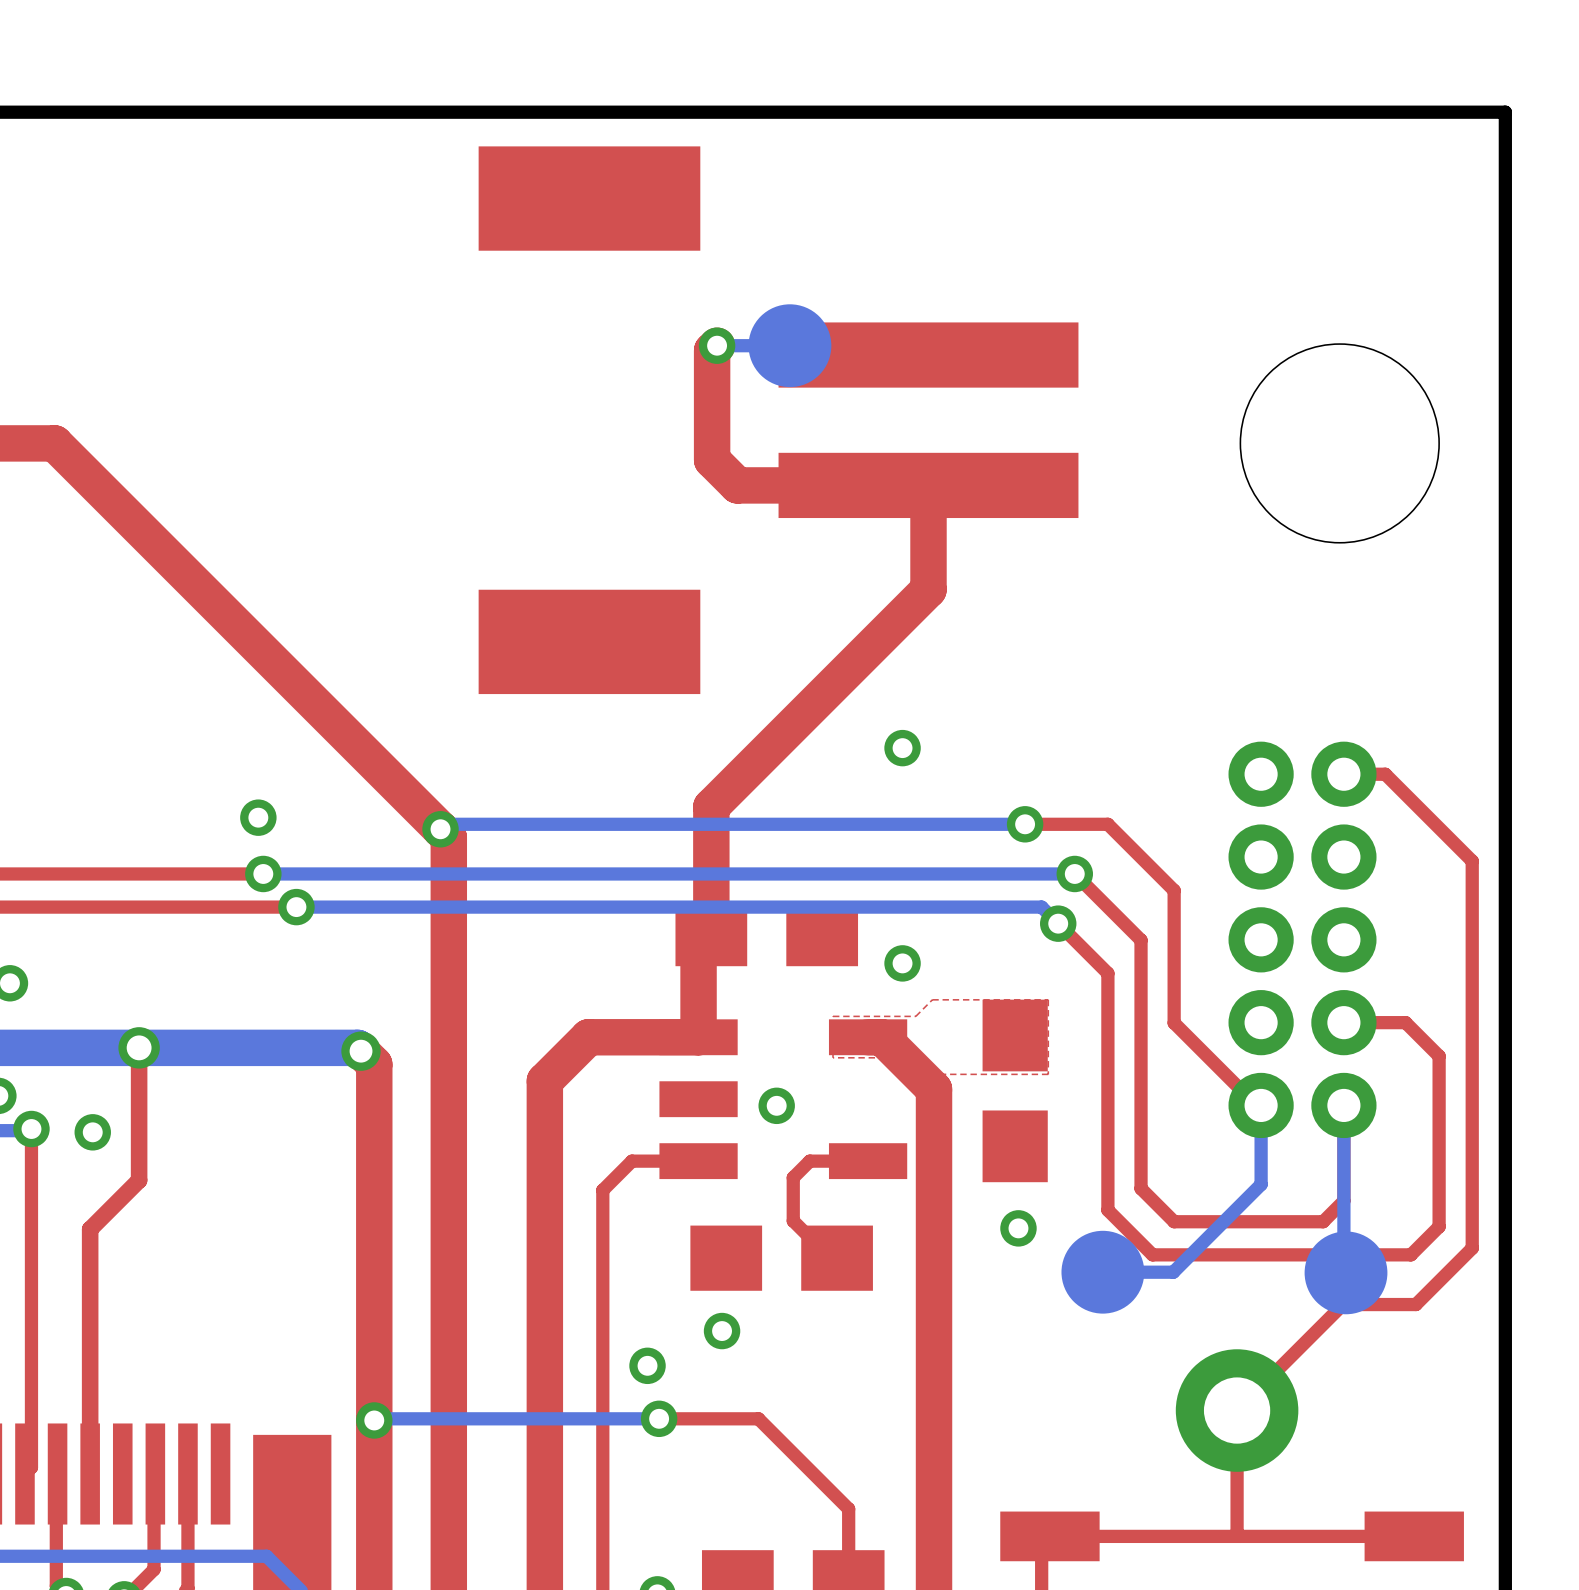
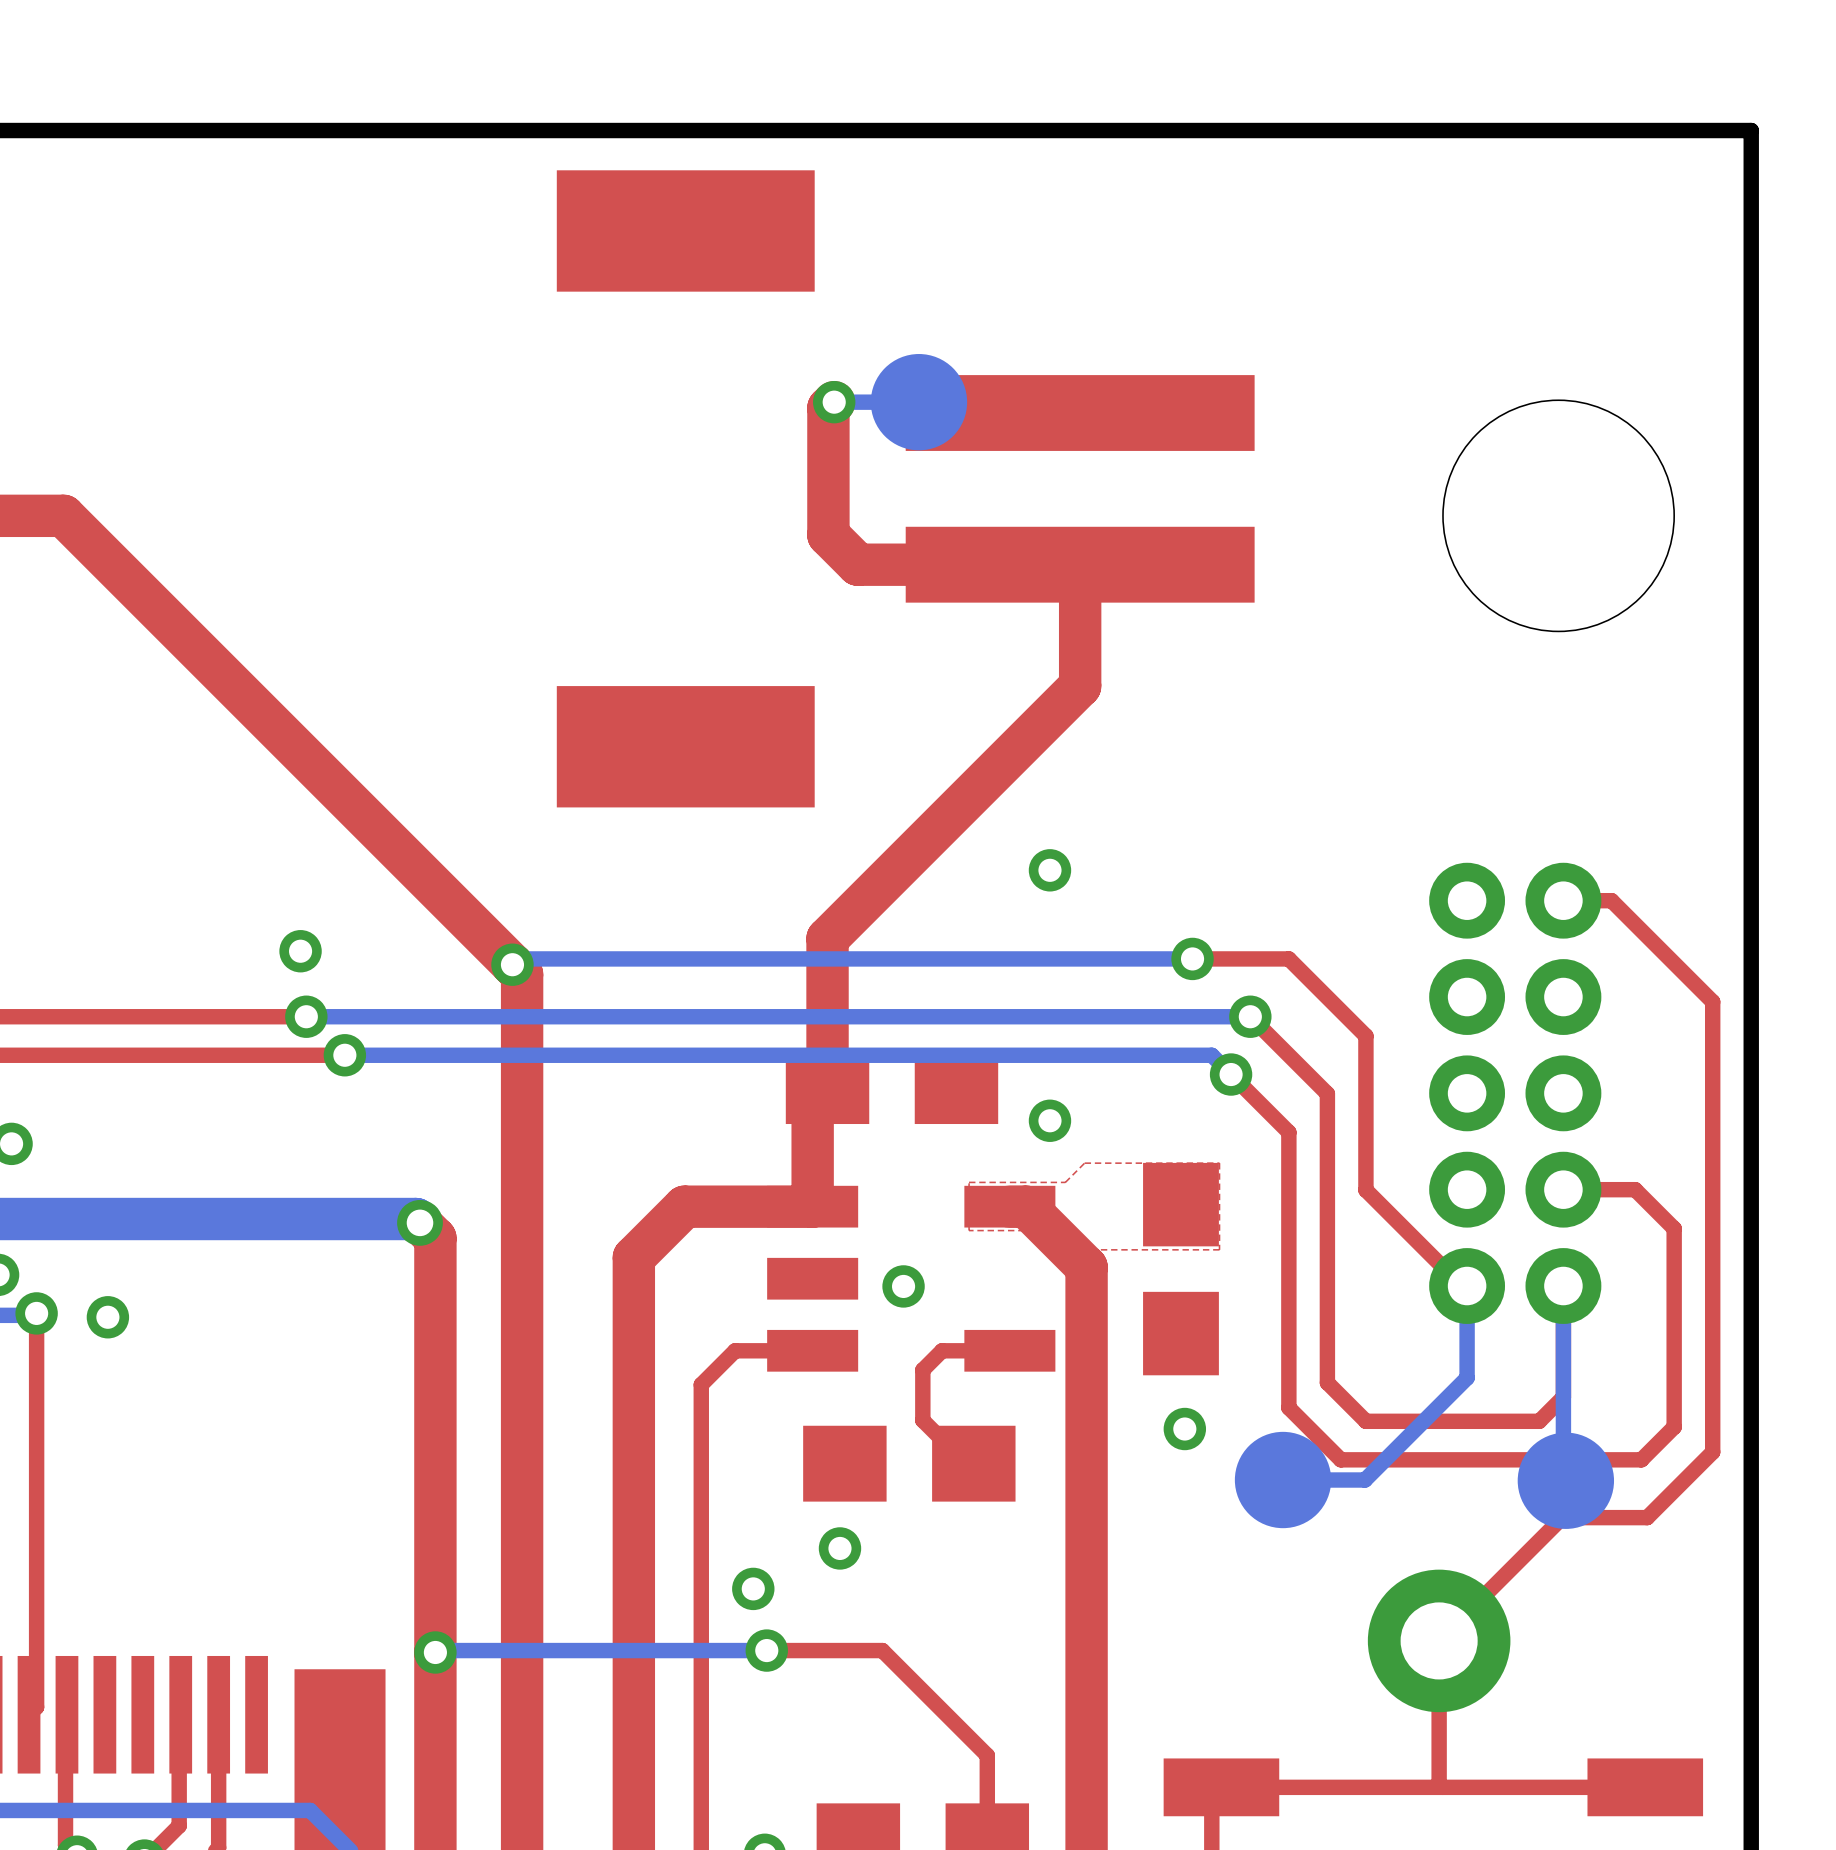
top track: (139, 1047) (139, 1180) (90, 1229) (90, 1474) -> none
via: (139, 1047) -> none

